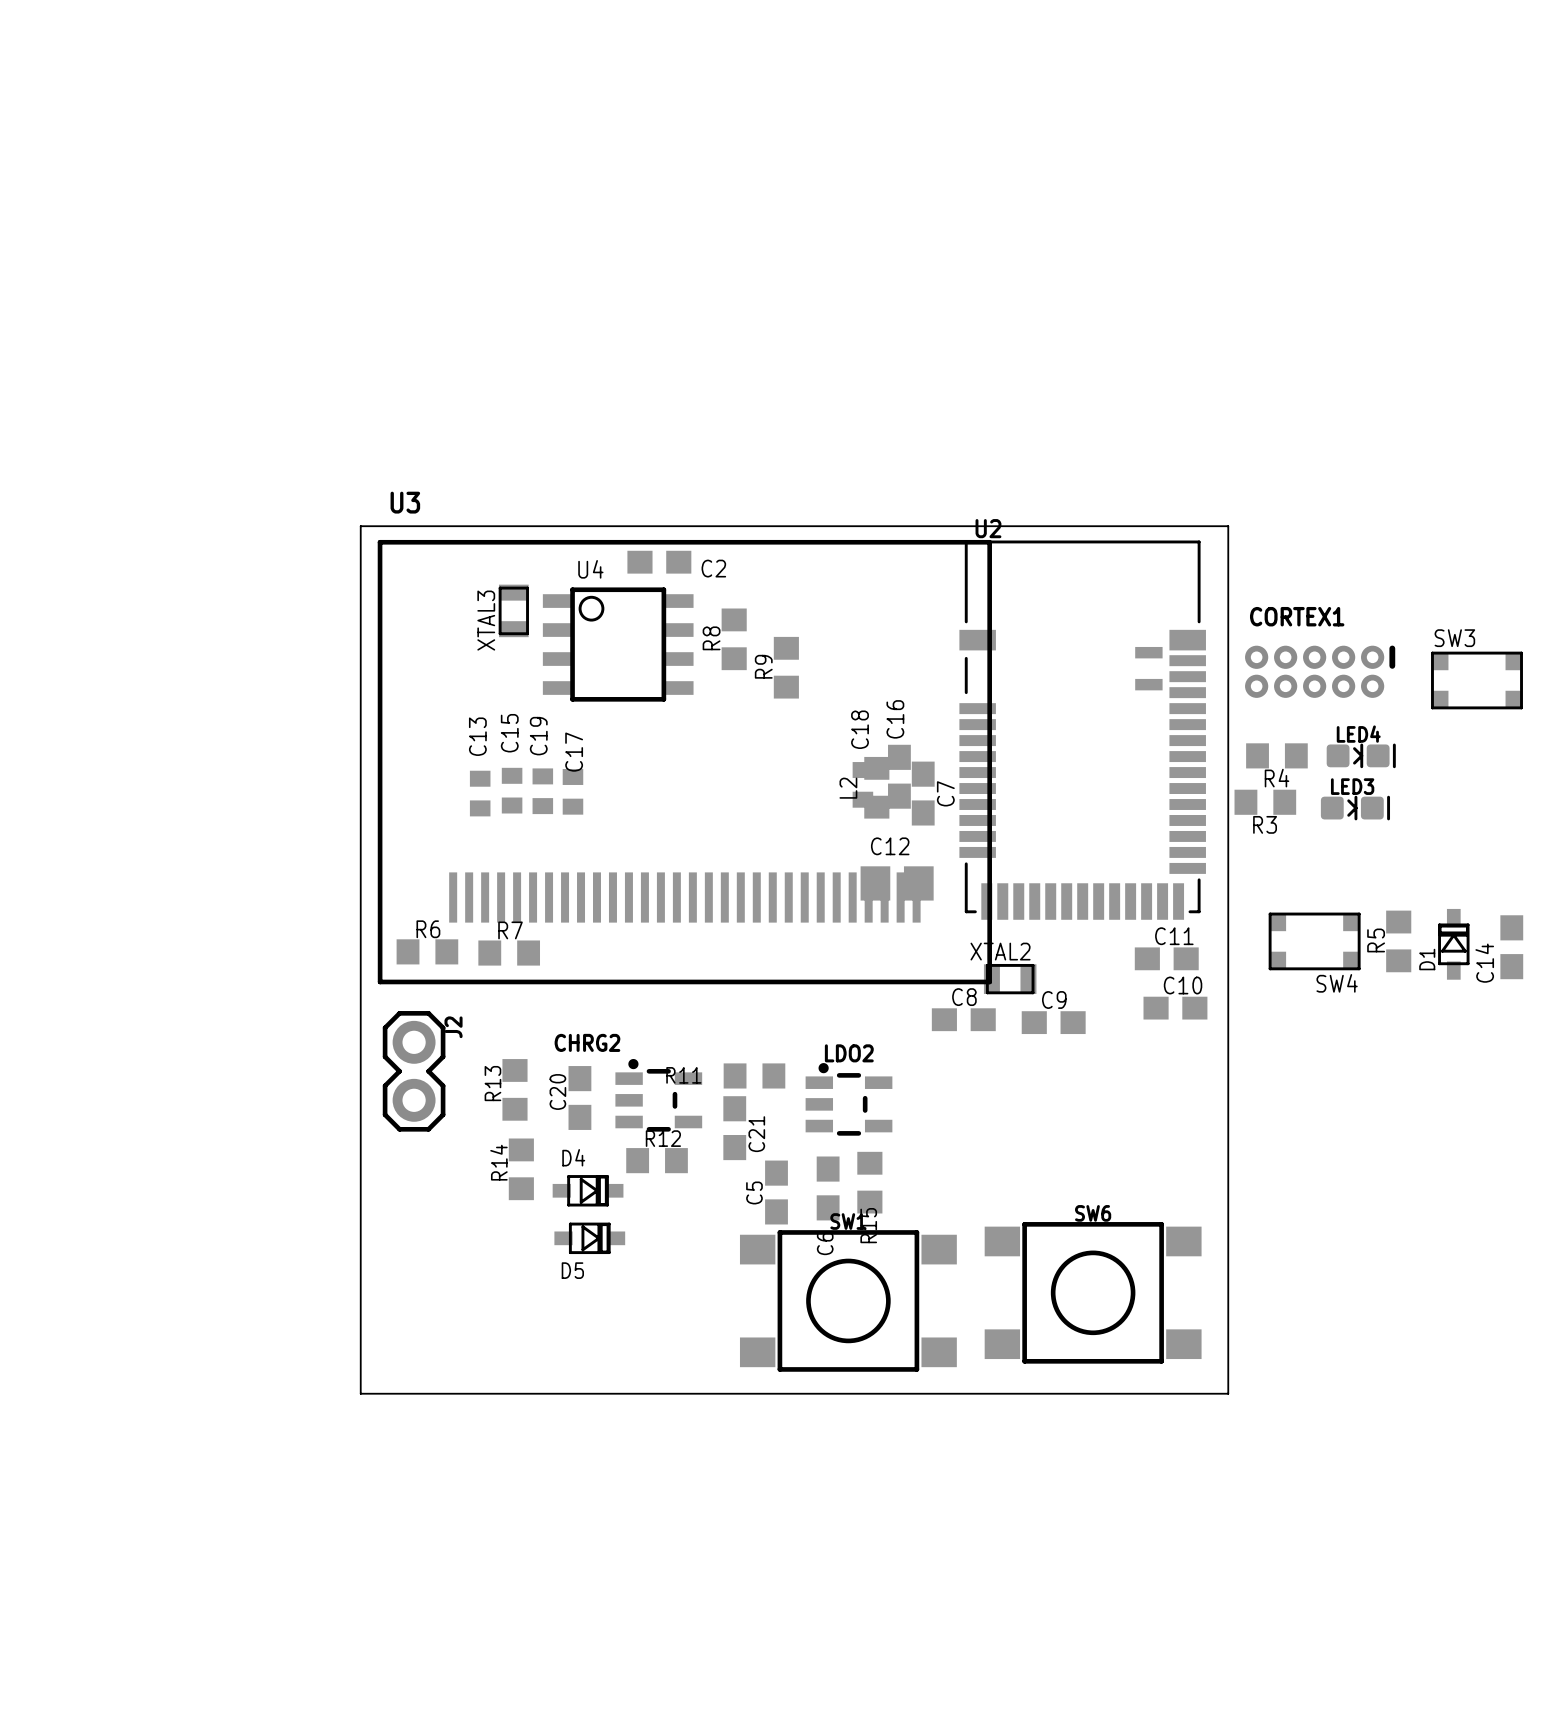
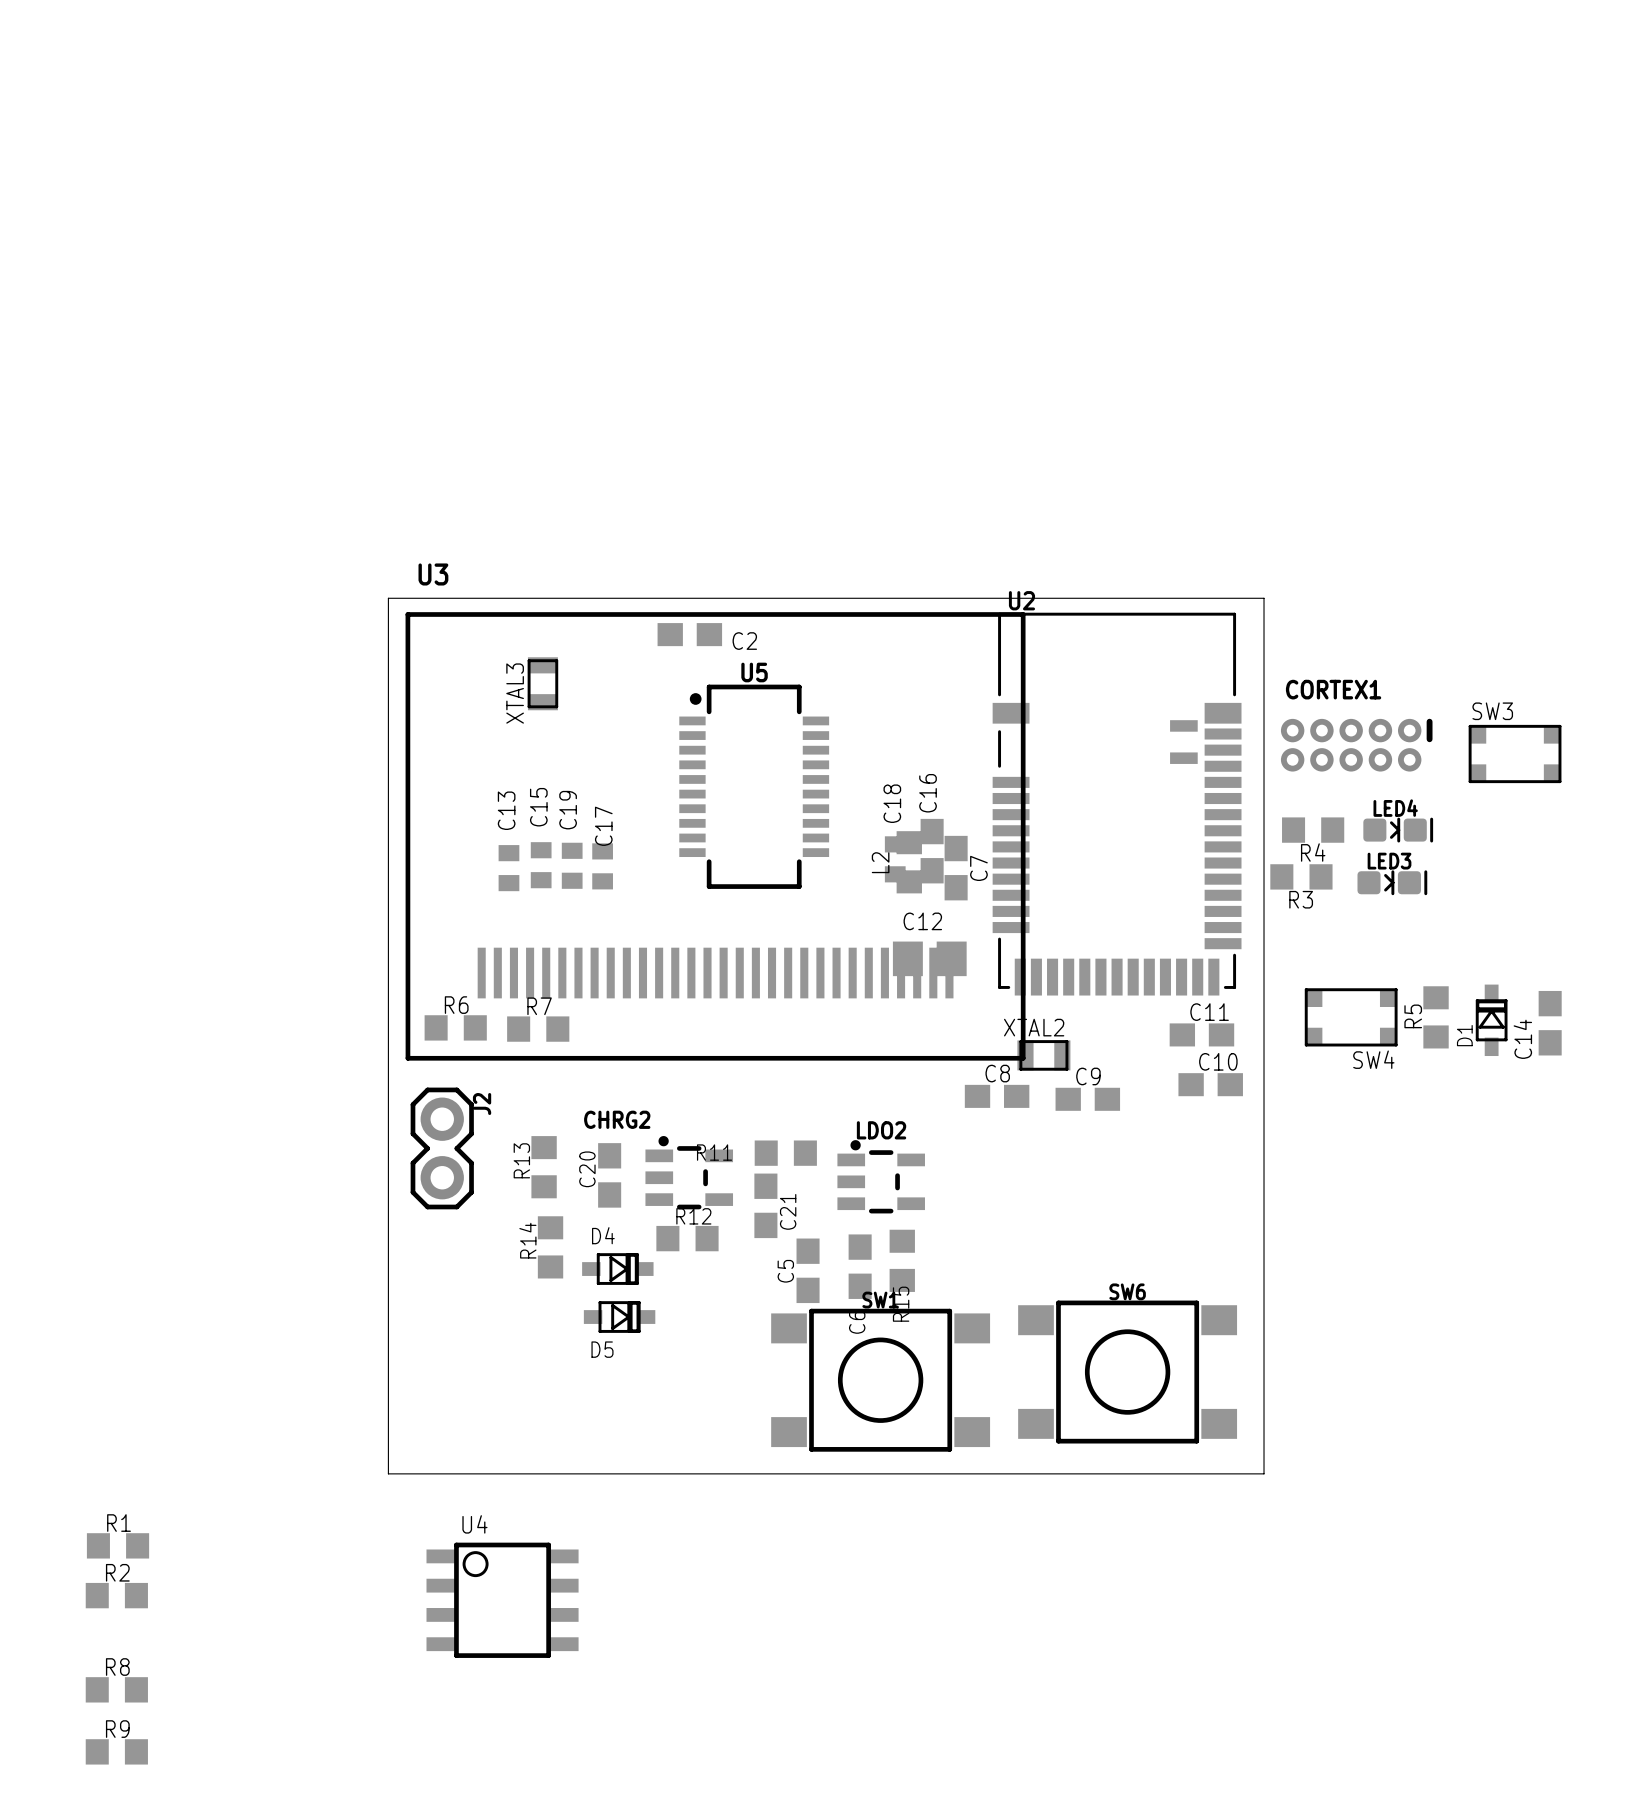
R8 rotation: 0° (734, 639) -> 90° clockwise (116, 1689)
R8 position: (734, 639) -> (116, 1689)
U4 position: (618, 644) -> (502, 1600)
R9 rotation: 0° (786, 667) -> 90° clockwise (116, 1751)
R9 position: (786, 667) -> (116, 1751)
U5: none -> (754, 786)
R1: none -> (118, 1545)
R2: none -> (116, 1595)

